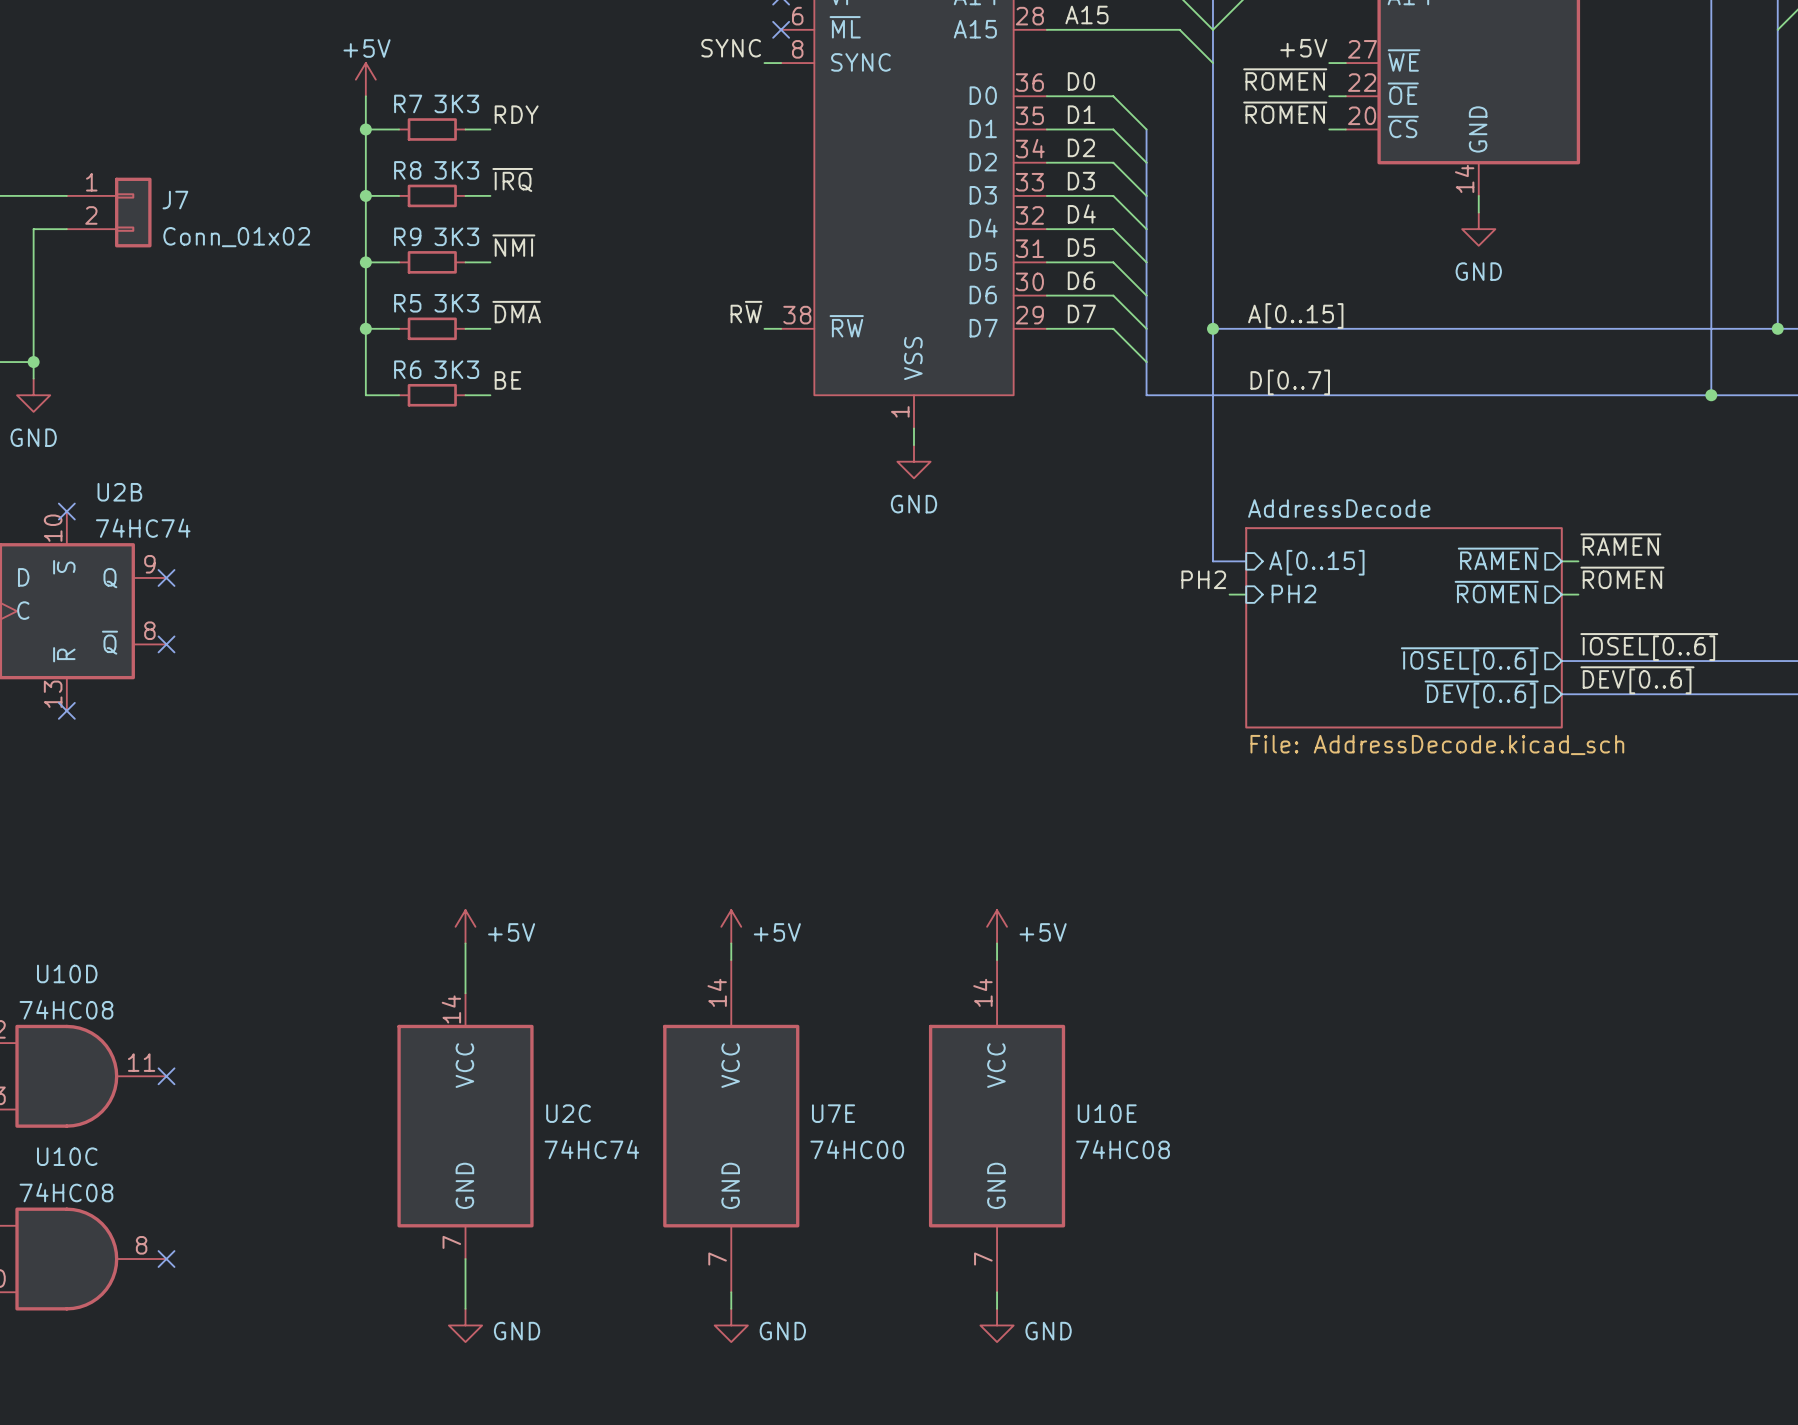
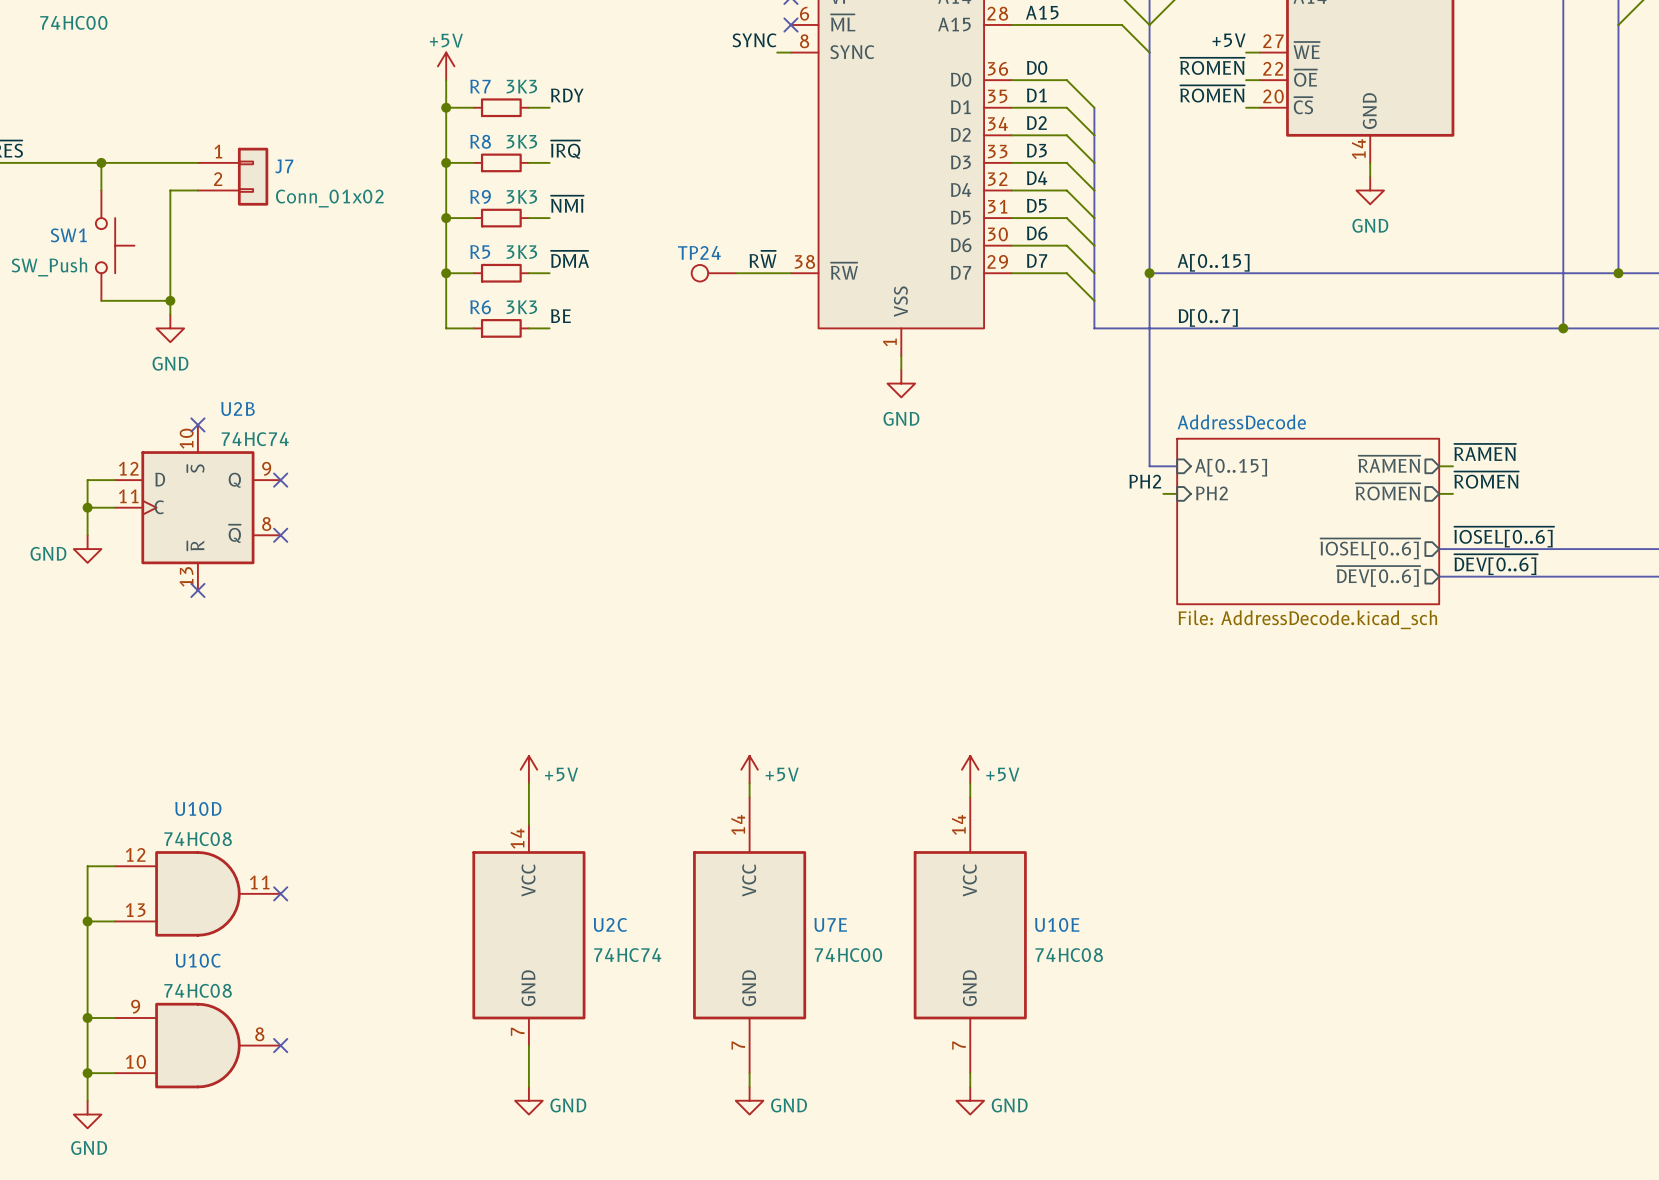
TP24: none -> (713, 273)
wire: none -> (735, 273) (777, 273)

